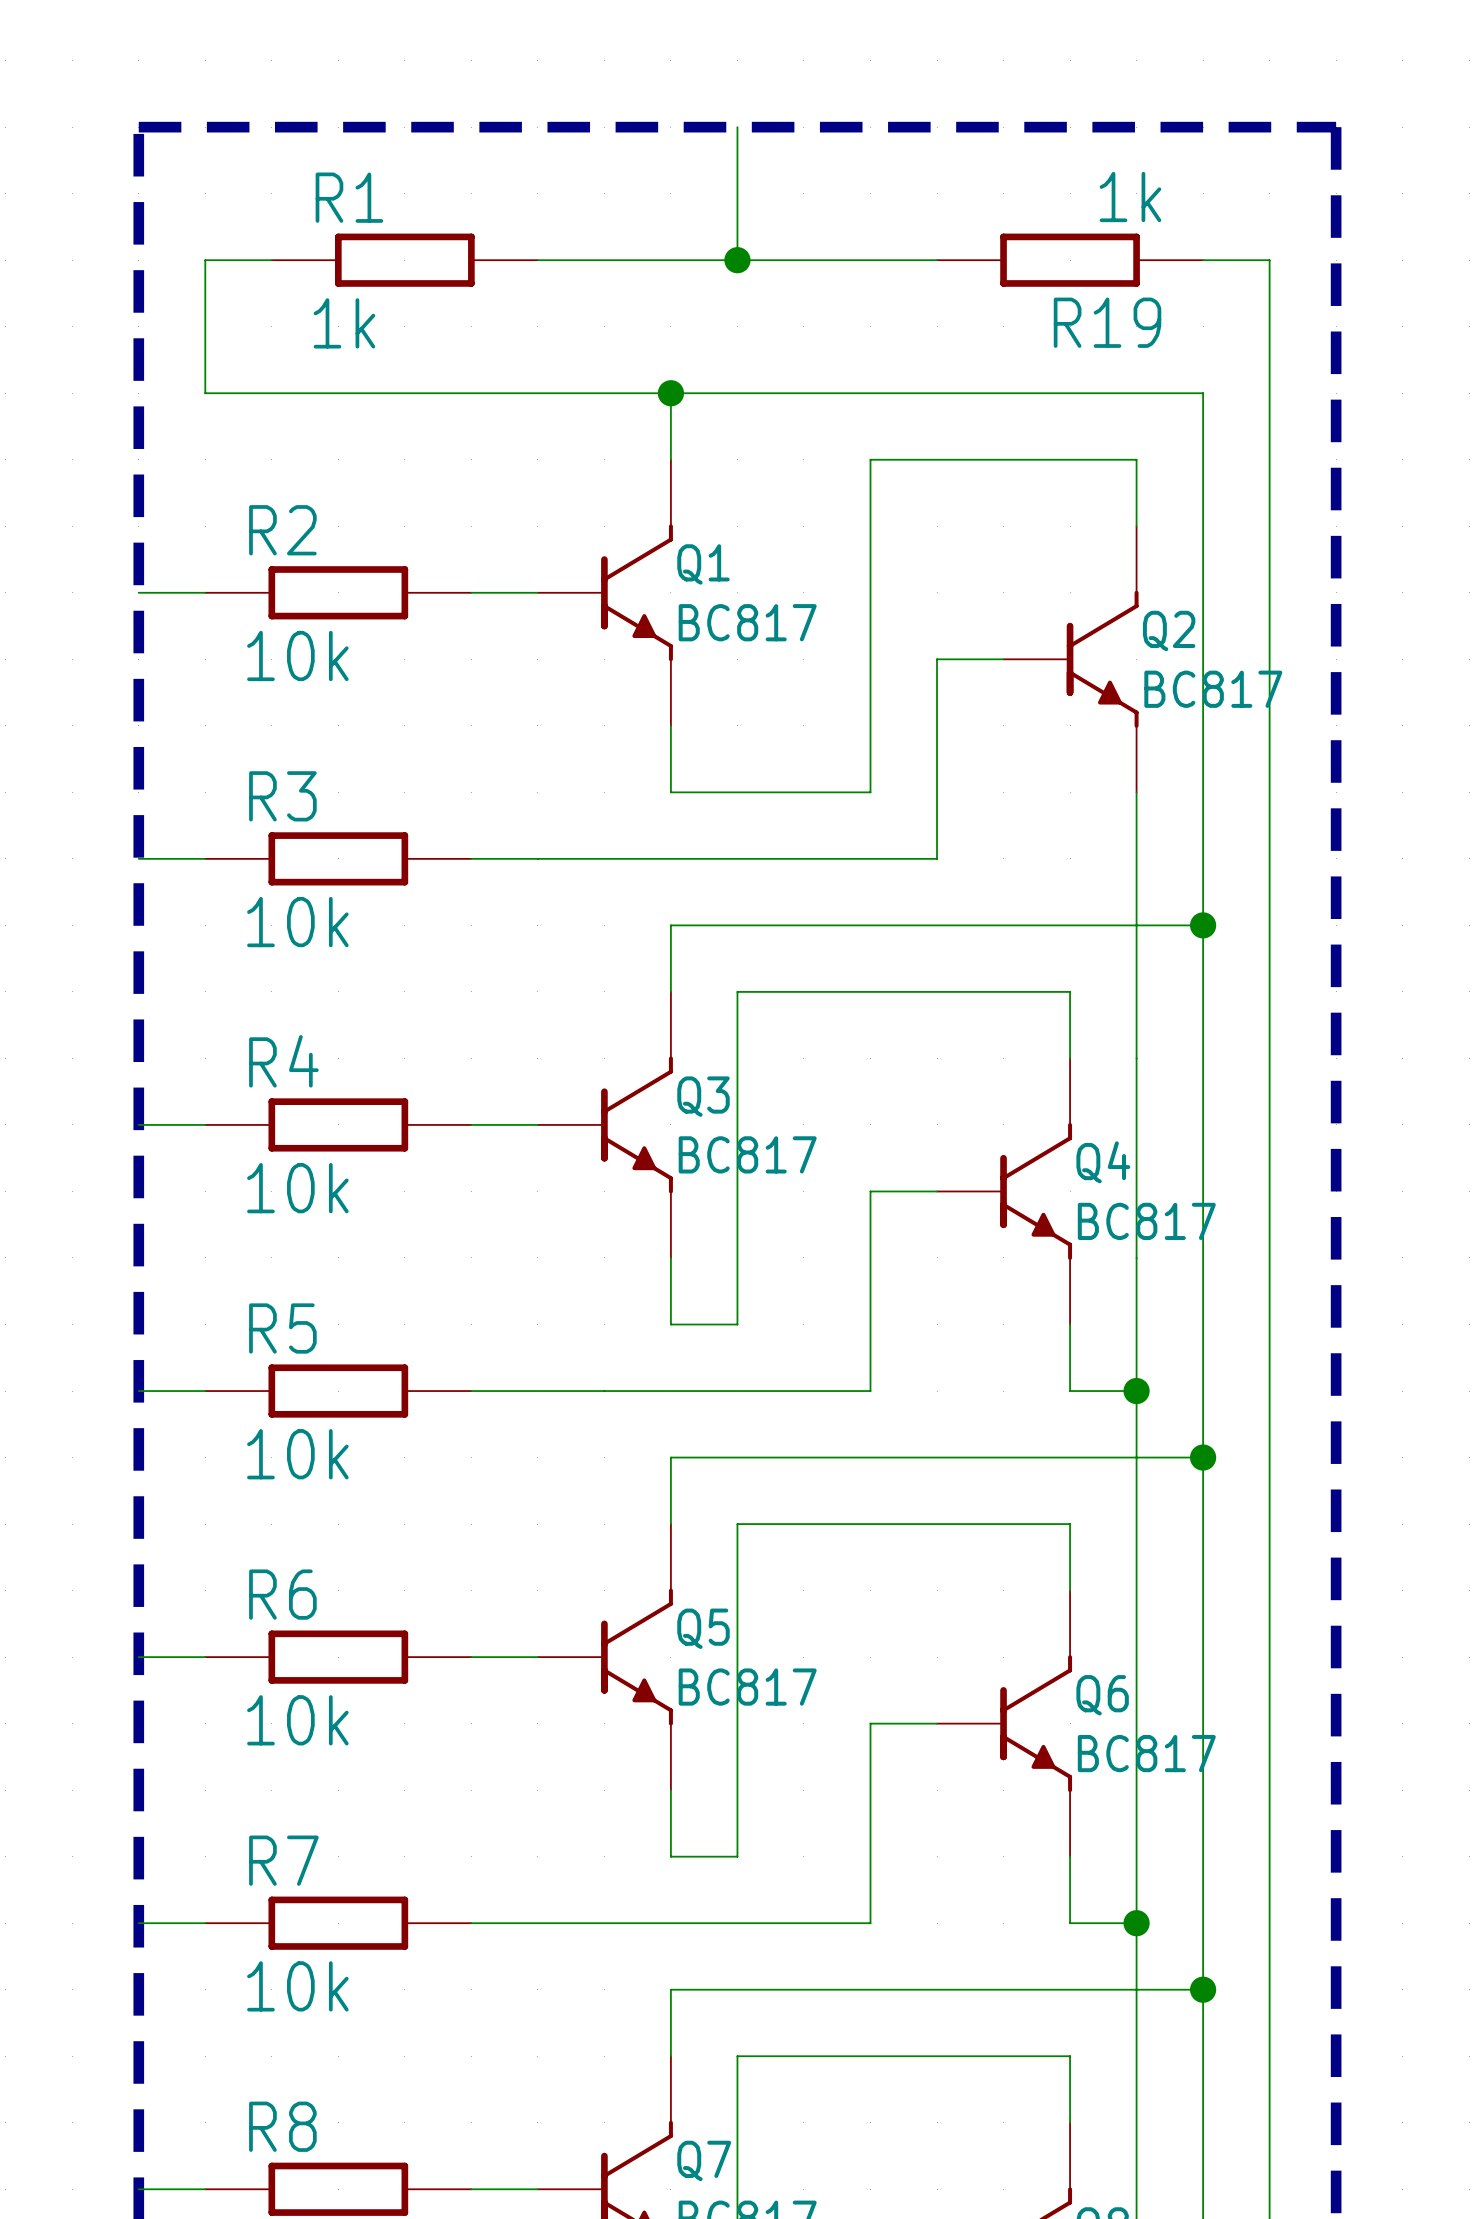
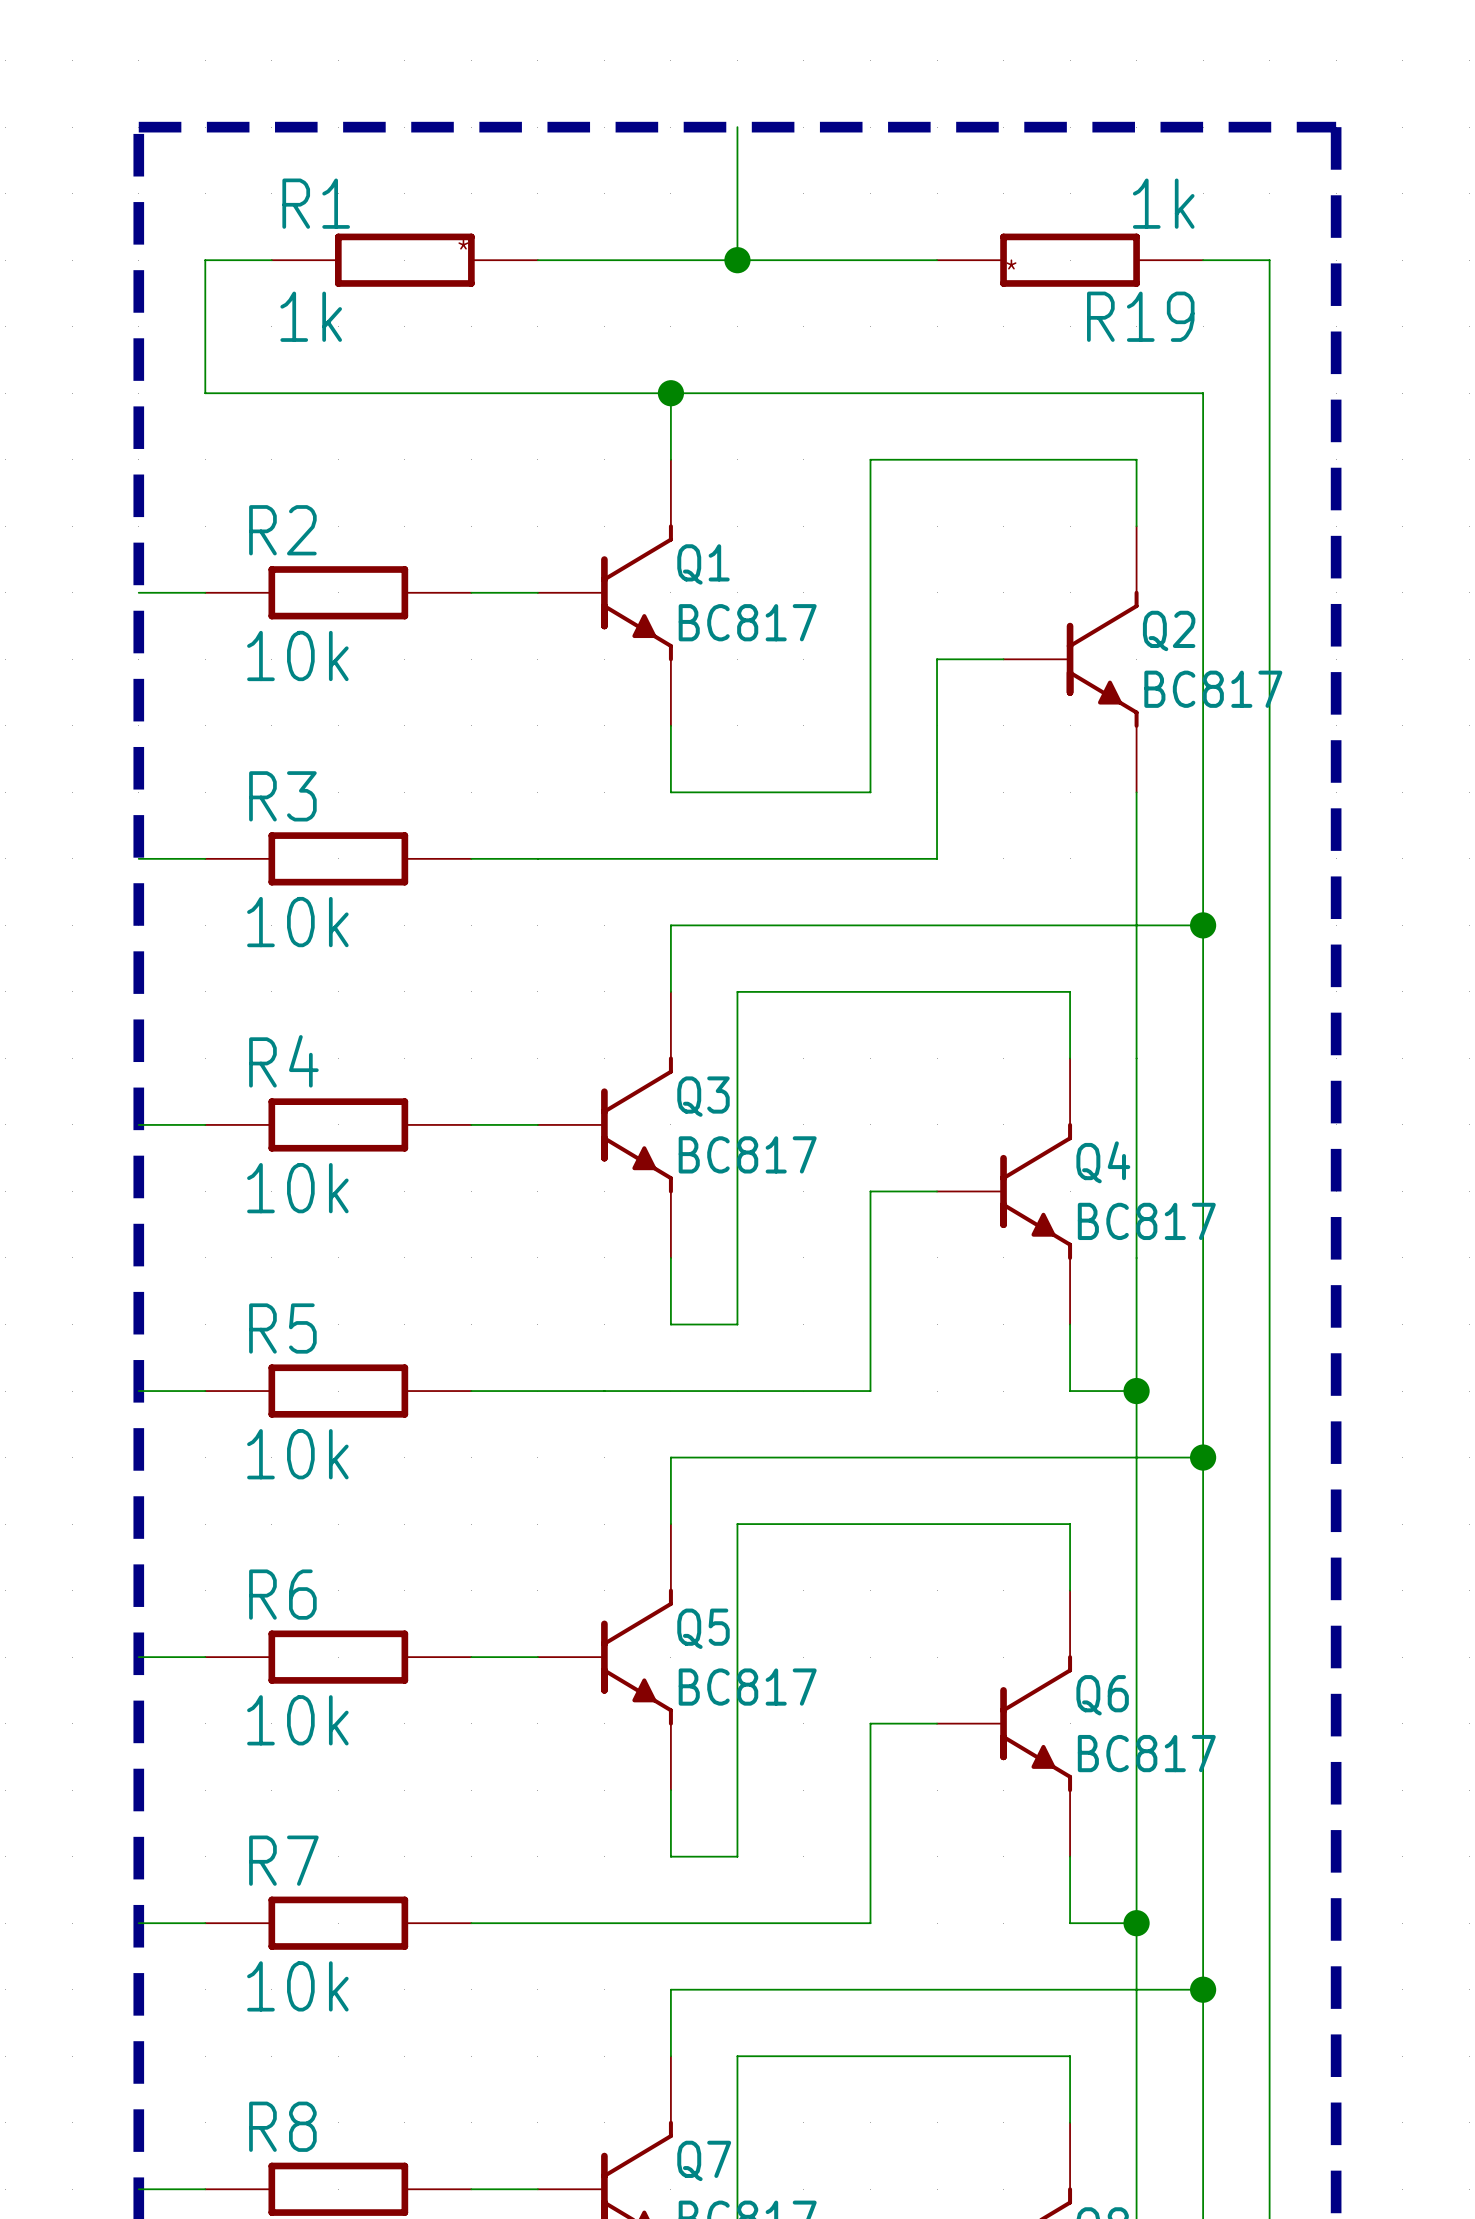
R1 name position: R1 (349, 197) -> R1 (316, 203)
R19 value position: 1k (1130, 197) -> 1k (1163, 203)
R1 text: none -> * (463, 244)
R19 text: none -> * (1011, 264)
R19 name position: R19 (1107, 322) -> R19 (1140, 316)
R1 value position: 1k (344, 323) -> 1k (311, 316)

